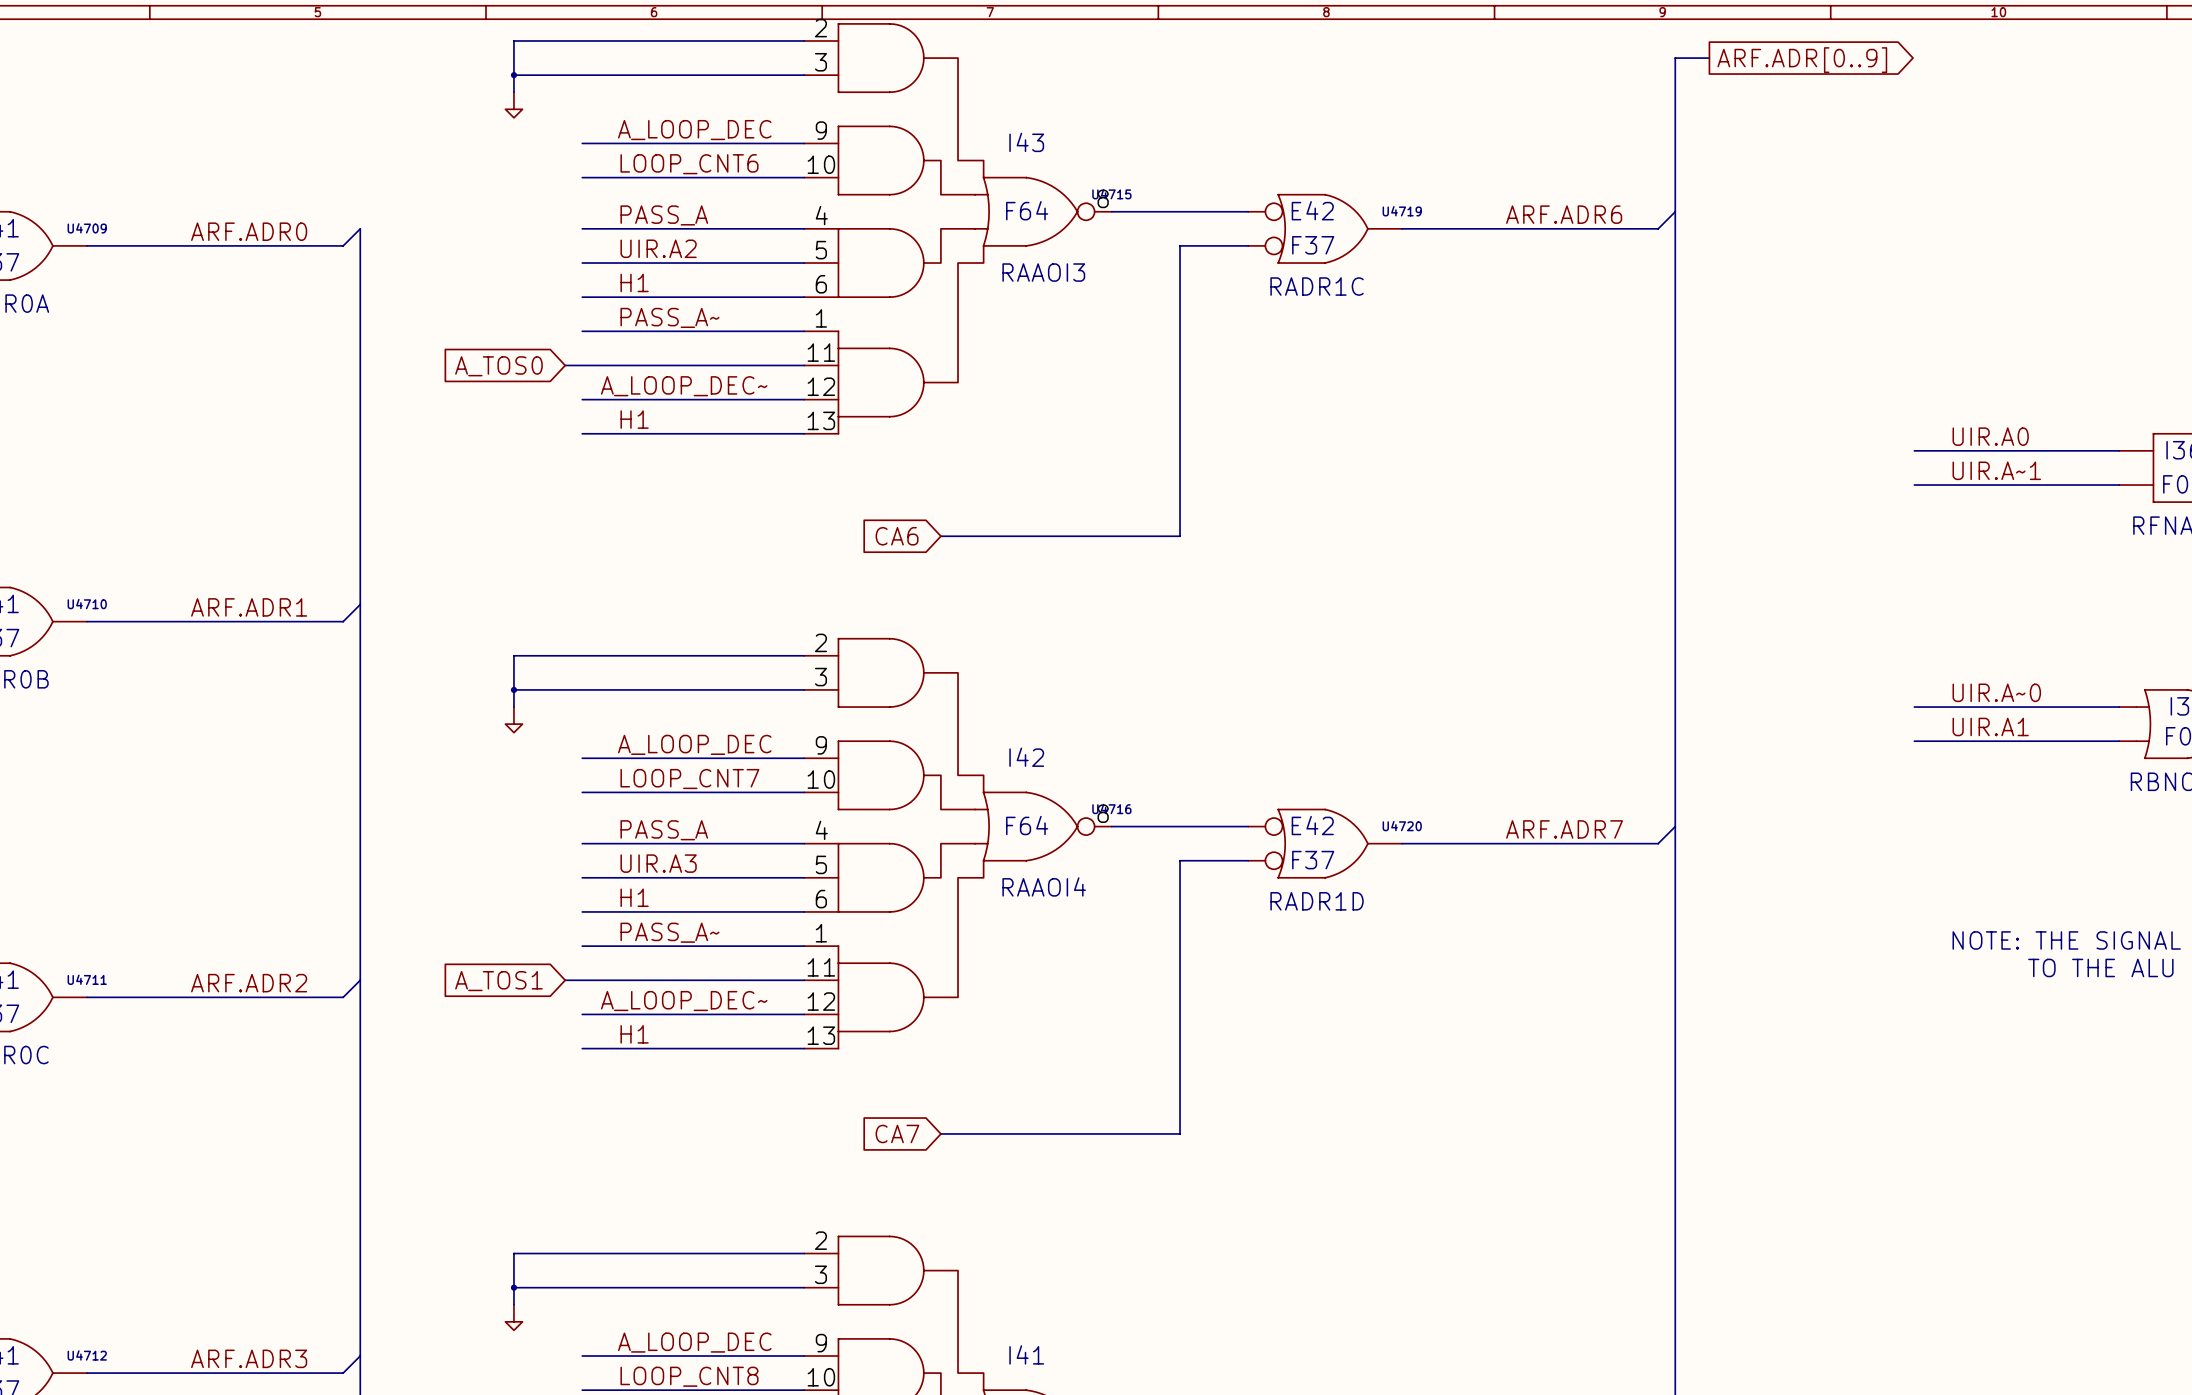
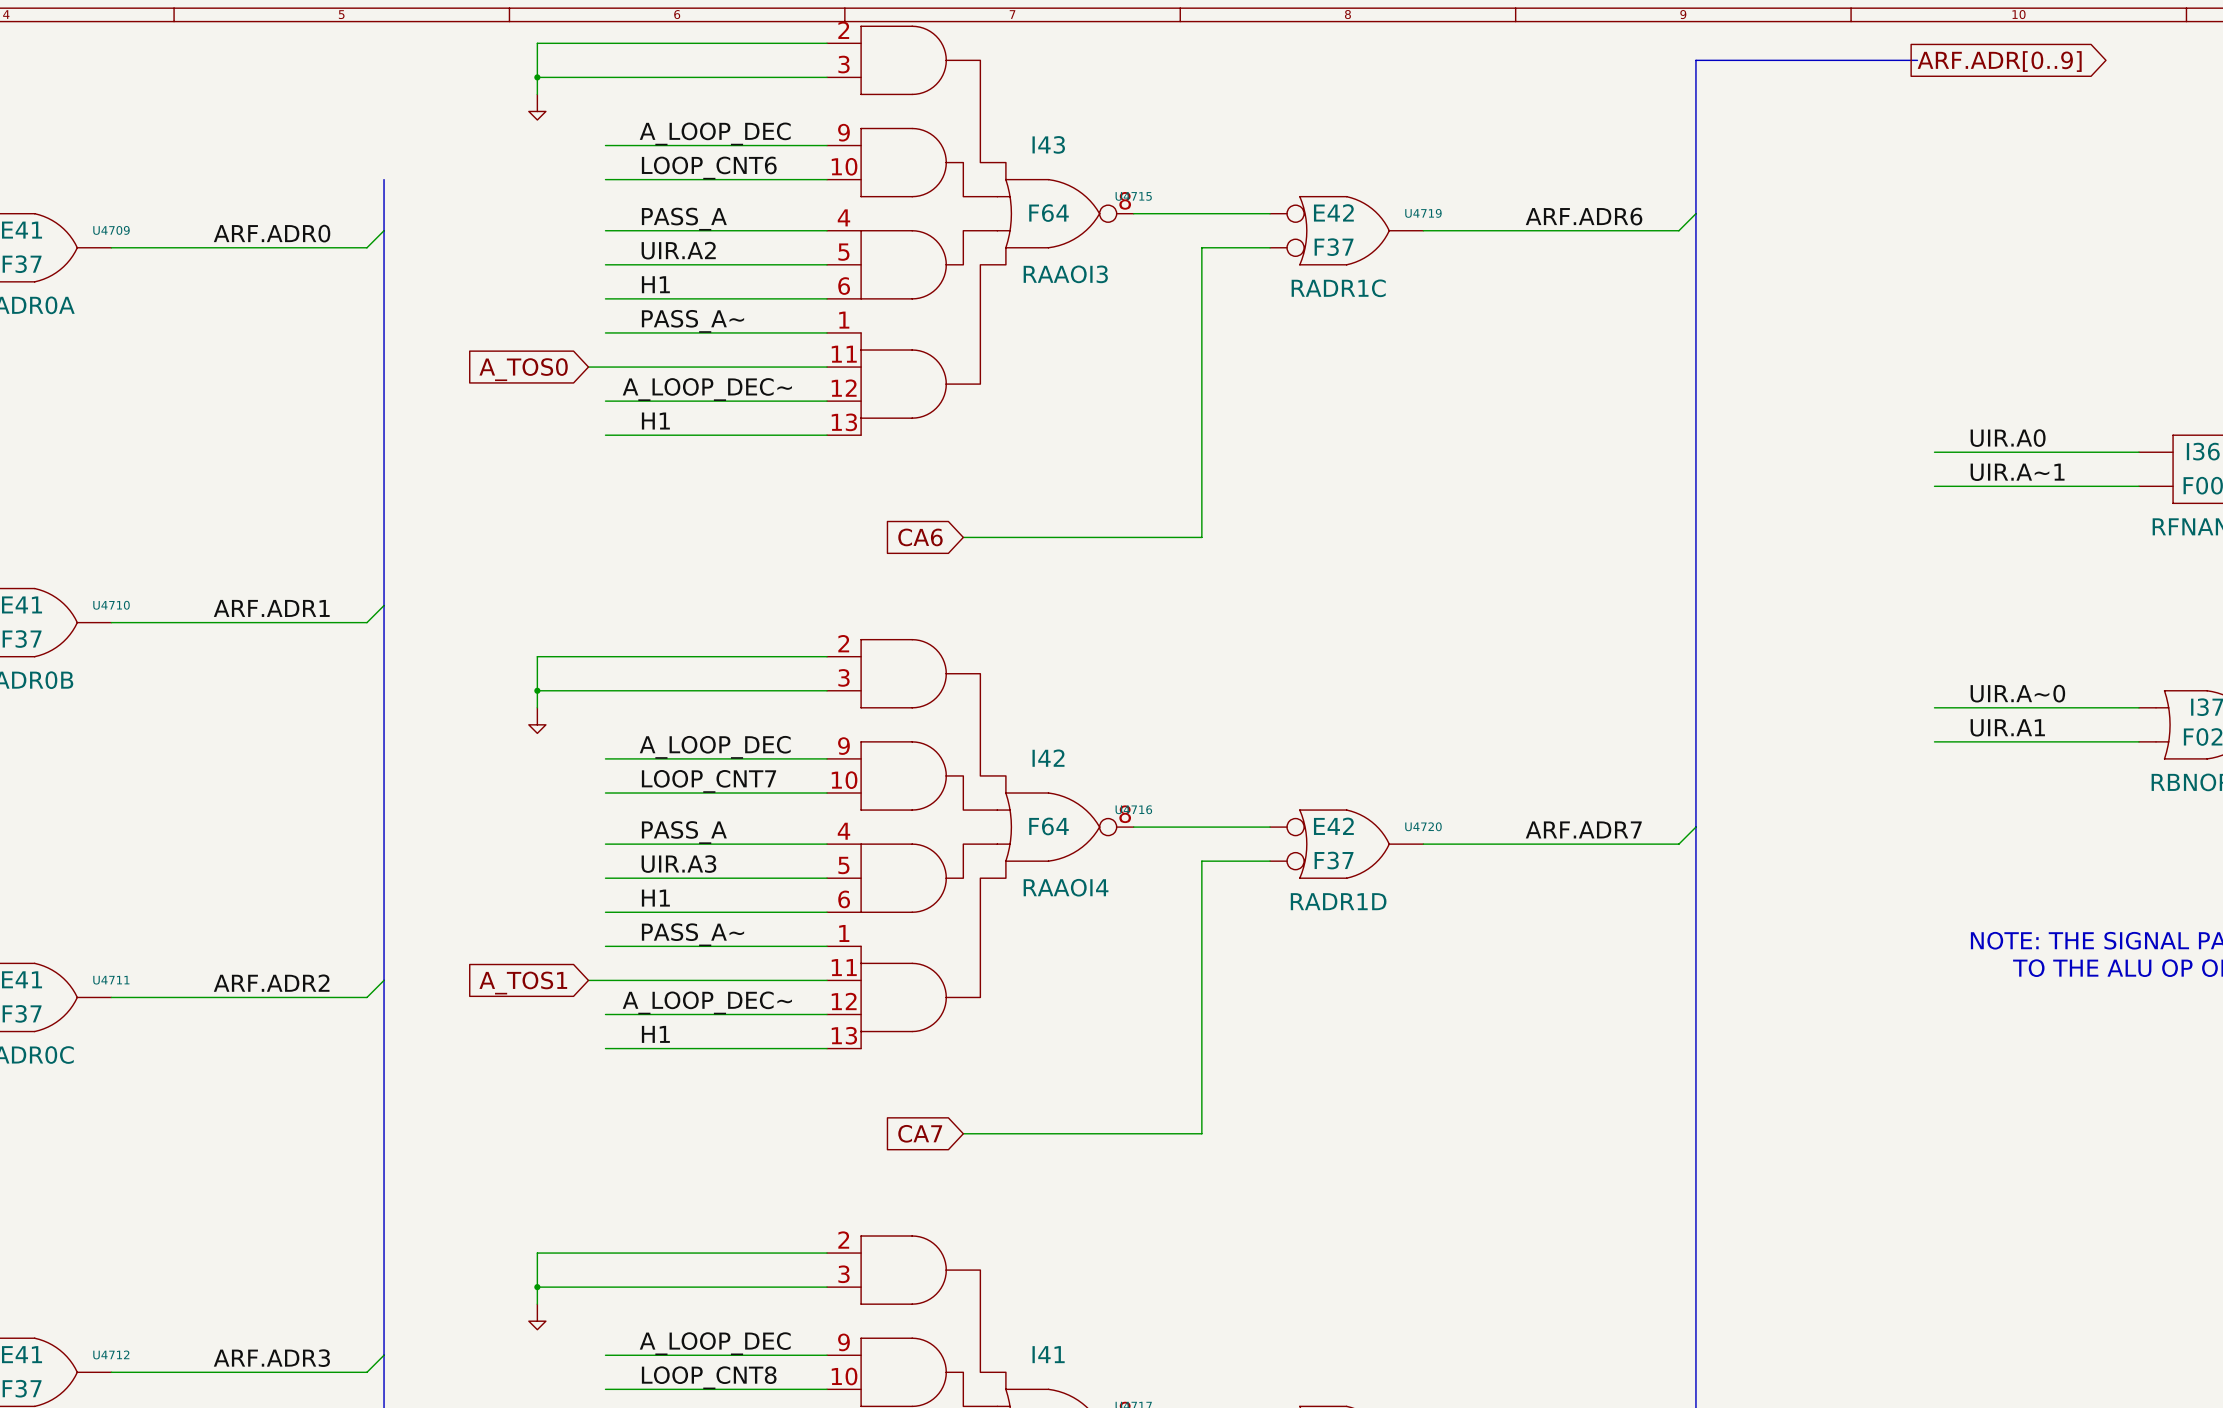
bus: none -> (1730, 60) (1917, 60)
global label: ARF.ADR[0..9] (1802, 60) -> none
global label: none -> ARF.ADR[0..9] (1999, 61)
bus: none -> (384, 179) (384, 230)

